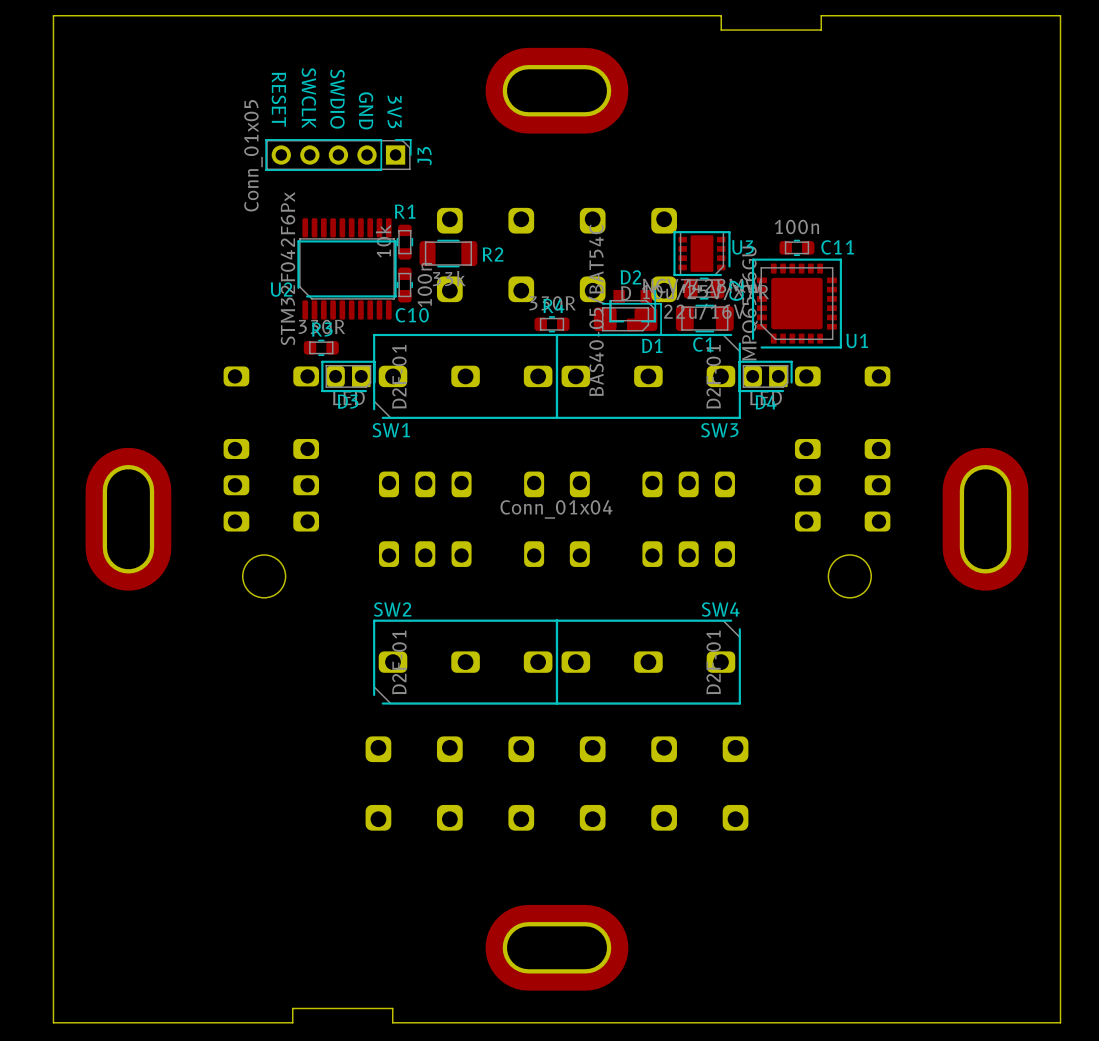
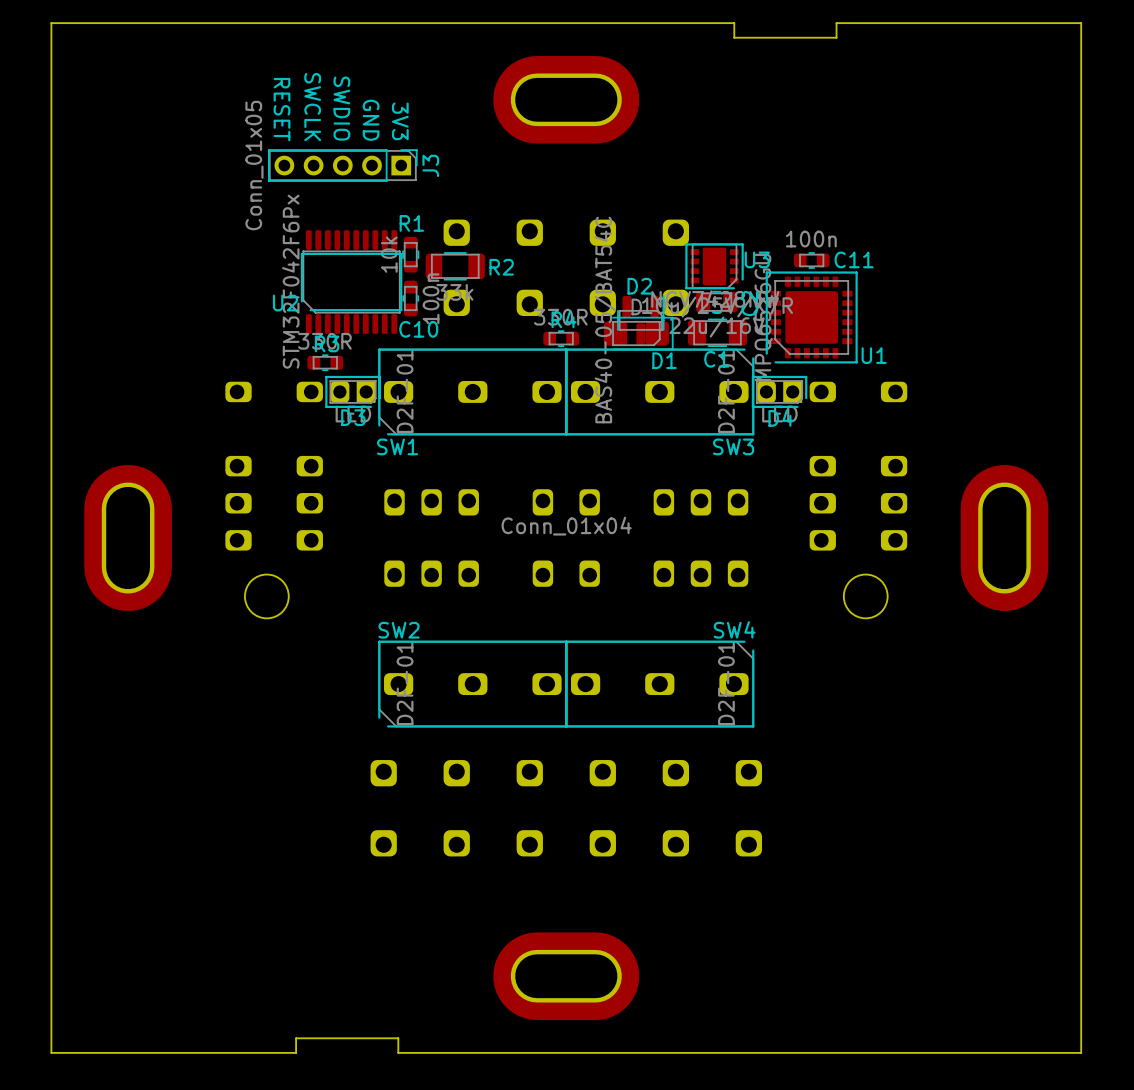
D2 footprint: [609, 289, 657, 332] -> [617, 295, 665, 345]

